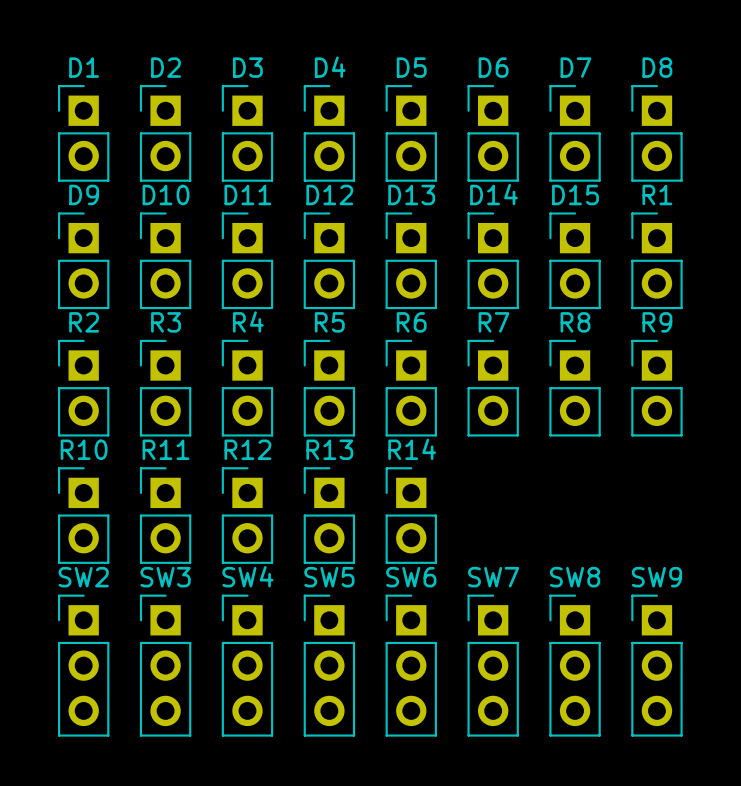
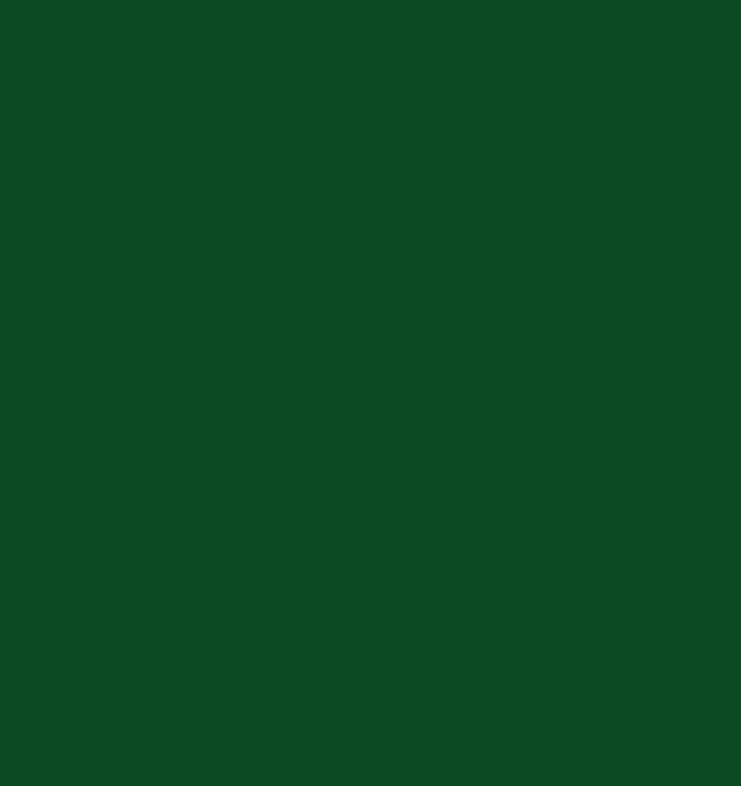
D1: (83, 133) -> none
D2: (165, 133) -> none
D3: (247, 133) -> none
D4: (329, 133) -> none
D5: (411, 133) -> none
D6: (493, 133) -> none
D7: (575, 133) -> none
D8: (656, 133) -> none
D9: (83, 260) -> none
D10: (165, 260) -> none
D11: (247, 260) -> none
D12: (329, 260) -> none
D13: (411, 260) -> none
D14: (493, 260) -> none
D15: (575, 260) -> none
R1: (656, 260) -> none
R2: (83, 388) -> none
R3: (165, 388) -> none
R4: (247, 388) -> none
R5: (329, 388) -> none
R6: (411, 388) -> none
R7: (493, 388) -> none
R8: (575, 388) -> none
R9: (656, 388) -> none
R10: (83, 515) -> none
R11: (165, 515) -> none
R12: (247, 515) -> none
R13: (329, 515) -> none
R14: (411, 515) -> none
SW2: (83, 665) -> none
SW3: (165, 665) -> none
SW4: (247, 665) -> none
SW5: (329, 665) -> none
SW6: (411, 665) -> none
SW7: (493, 665) -> none
SW8: (575, 665) -> none
SW9: (656, 665) -> none

